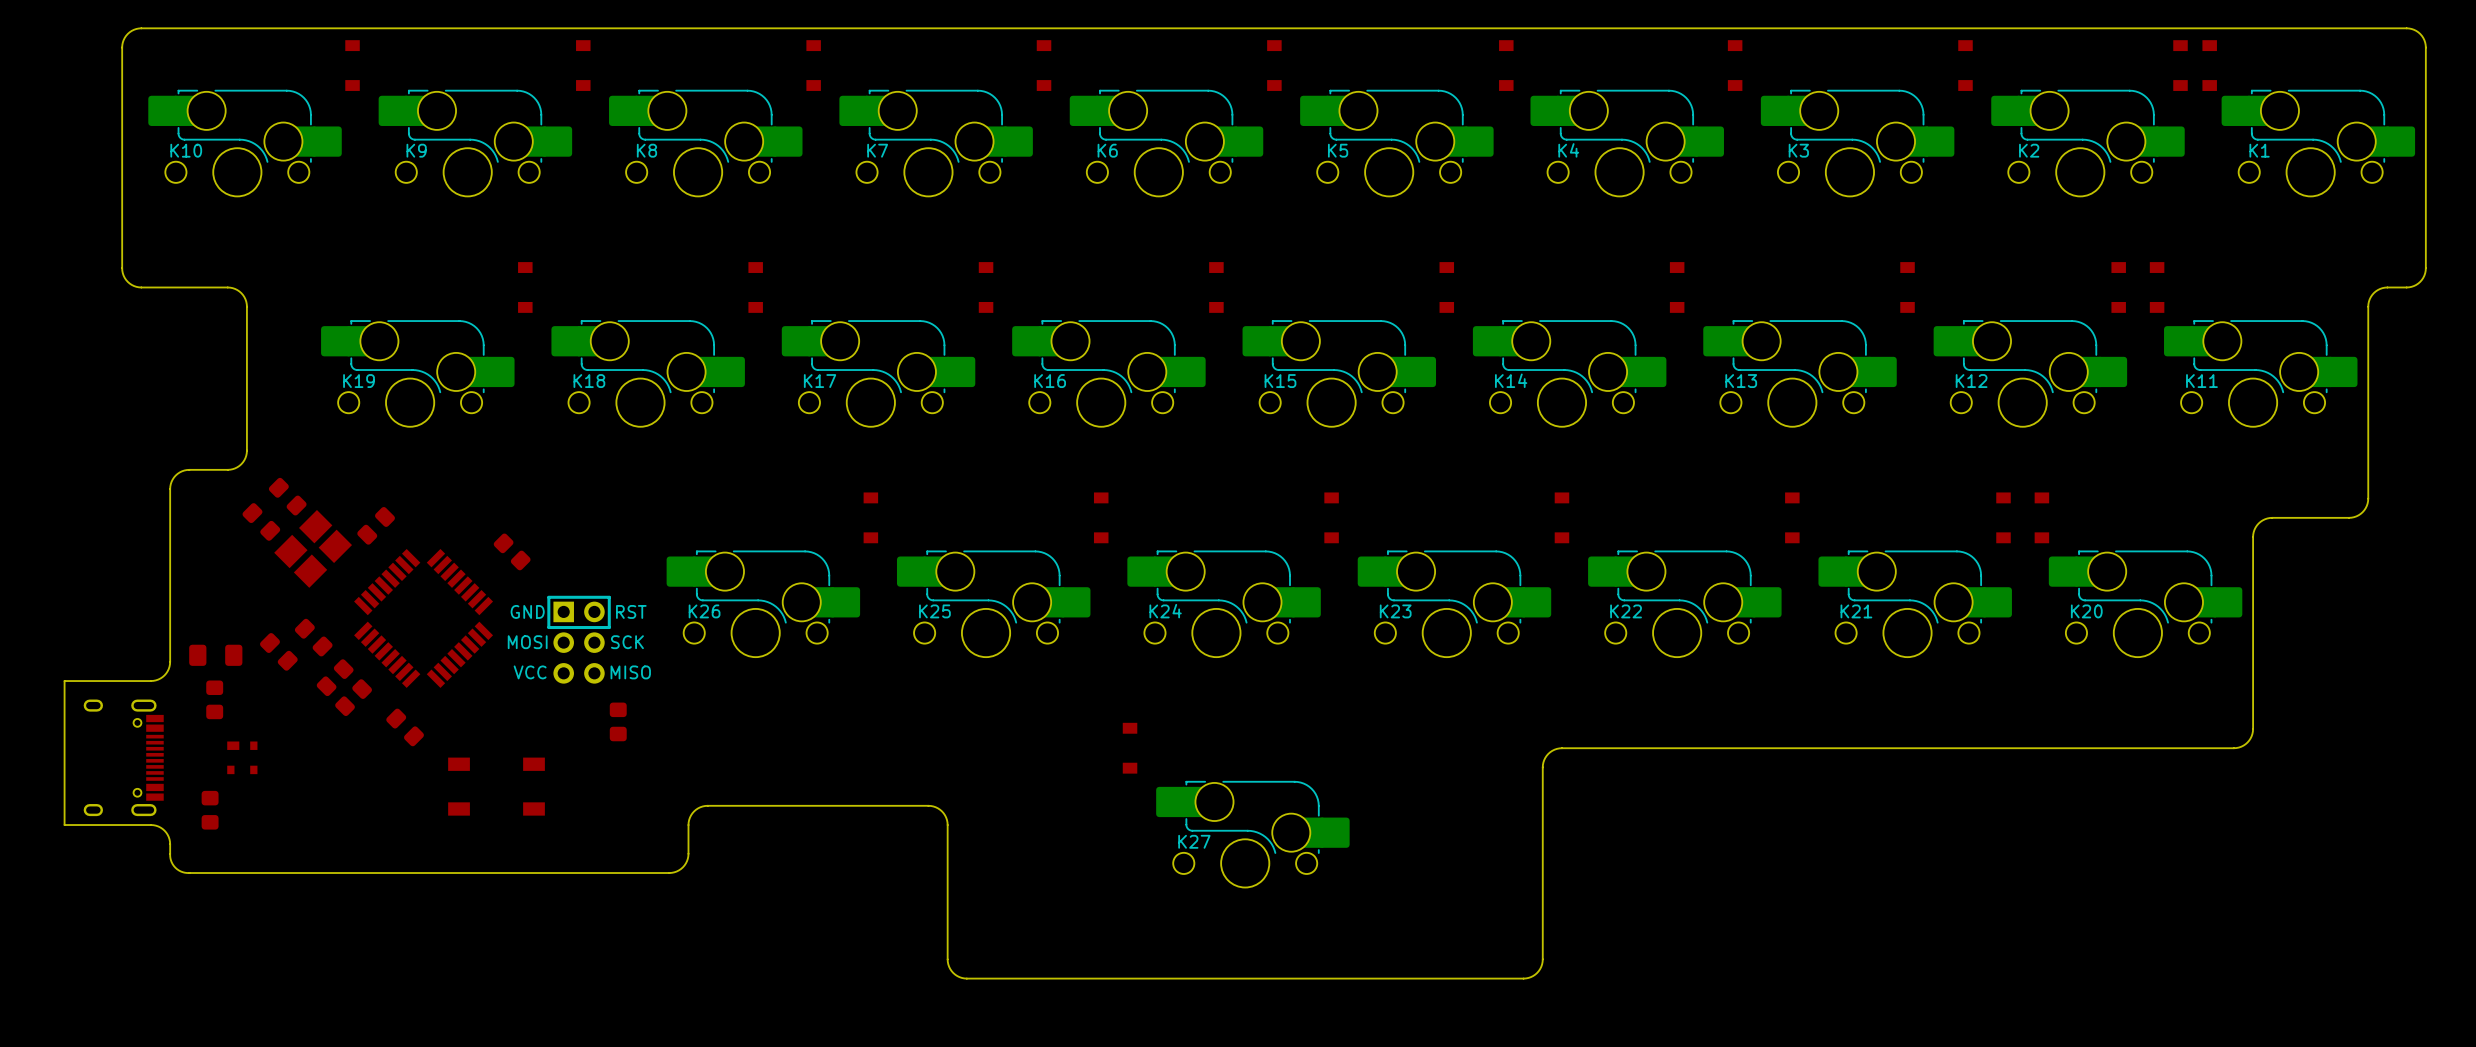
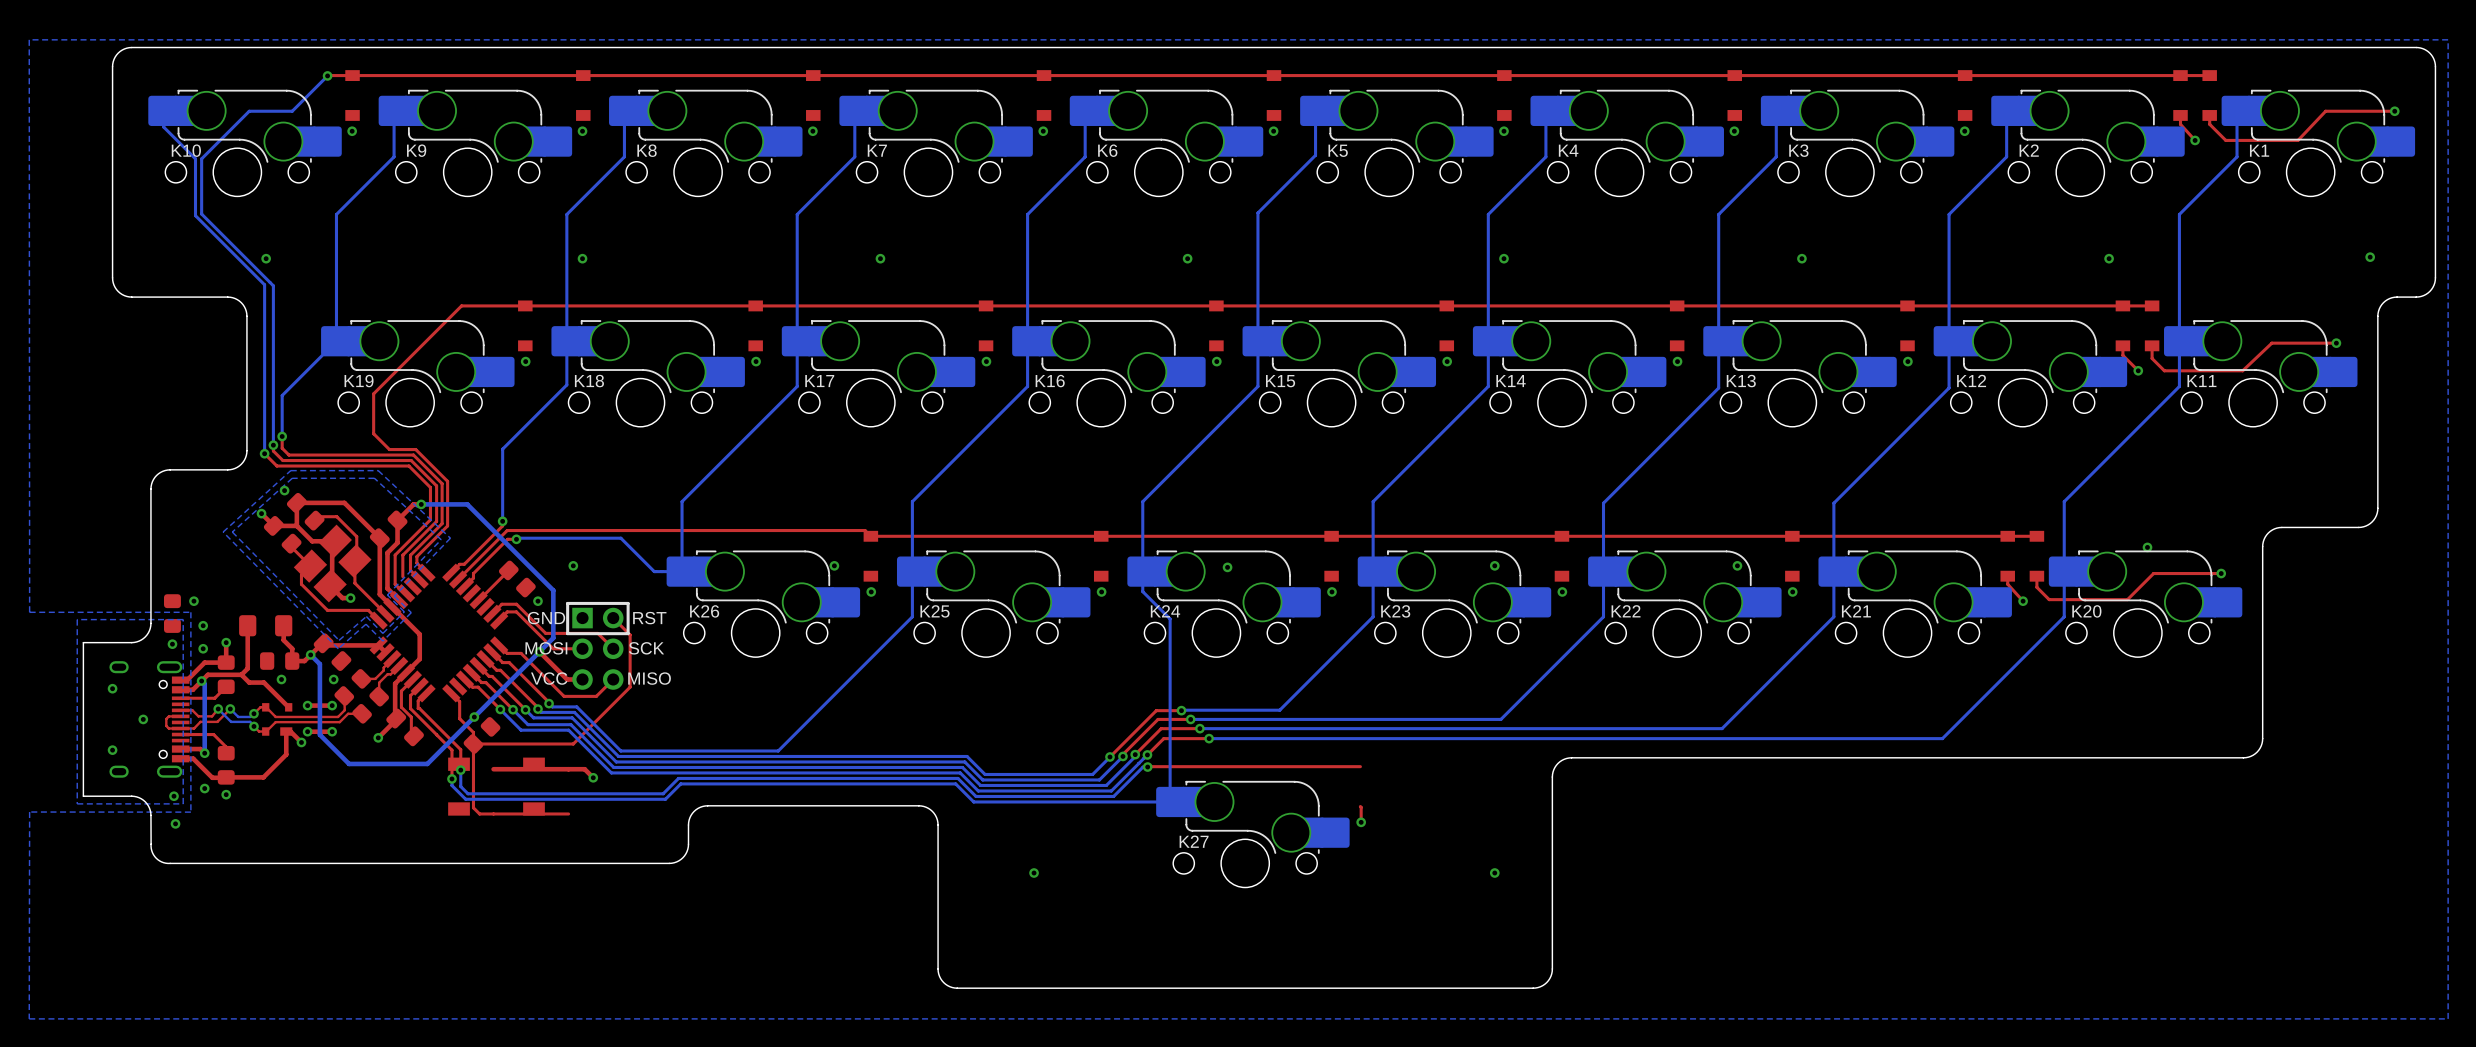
bottom zone outline: none -> (2448, 39) (2448, 1018) (29, 1018) (29, 812) (190, 812) (190, 612) (29, 612) (29, 39) (2448, 39)
part position: (352, 65) -> (352, 95)
part position: (583, 65) -> (583, 95)
part position: (813, 65) -> (813, 95)
part position: (1044, 65) -> (1044, 95)
part position: (1274, 65) -> (1274, 95)
part position: (1506, 65) -> (1504, 95)
part position: (1735, 65) -> (1734, 95)
part position: (1965, 65) -> (1965, 95)
part: (2180, 65) -> none
part: (2209, 65) -> none
bottom track: none -> (327, 75) (292, 111) (249, 111) (201, 158) (201, 214) (273, 285) (273, 445)
via: none -> (327, 75)
top track: none -> (2209, 75) (327, 75)
part: none -> (2180, 95)
part: none -> (2209, 95)
bottom track: none -> (163, 110) (163, 127) (195, 158) (195, 215) (264, 284) (264, 453)
bottom track: none -> (394, 110) (394, 156) (336, 214) (336, 341) (282, 395) (282, 436)
bottom track: none -> (624, 110) (624, 156) (566, 214) (566, 384) (502, 449) (502, 521)
bottom track: none -> (854, 110) (854, 156) (797, 214) (797, 386) (682, 501) (682, 571) (654, 571) (620, 538) (516, 539)
bottom track: none -> (1085, 110) (1085, 156) (1027, 214) (1027, 386) (912, 501) (912, 616) (778, 750) (620, 750) (576, 706) (552, 706) (549, 703)
bottom track: none -> (1315, 110) (1315, 155) (1257, 212) (1257, 386) (1142, 501) (1142, 591) (1170, 618) (1171, 801)
bottom track: none -> (1545, 110) (1545, 156) (1488, 214) (1488, 386) (1373, 501) (1373, 616) (1279, 710) (1181, 710)
bottom track: none -> (1776, 110) (1776, 156) (1718, 214) (1718, 388) (1603, 503) (1603, 616) (1500, 719) (1190, 719)
bottom track: none -> (2006, 110) (2006, 156) (1949, 214) (1949, 388) (1833, 503) (1833, 616) (1722, 728) (1199, 728)
bottom track: none -> (2237, 110) (2237, 156) (2179, 214) (2179, 386) (2064, 501) (2064, 616) (1942, 738) (1209, 738)
top track: none -> (2394, 111) (2325, 111) (2297, 140) (2225, 140) (2209, 124) (2209, 115)
via: none -> (2394, 111)
top track: none -> (2180, 115) (2180, 124) (2195, 140)
via: none -> (352, 131)
via: none -> (582, 131)
via: none -> (812, 131)
via: none -> (1043, 131)
via: none -> (1273, 131)
via: none -> (1503, 131)
via: none -> (1734, 131)
via: none -> (1964, 131)
via: none -> (2195, 140)
via: none -> (2370, 257)
via: none -> (266, 258)
via: none -> (582, 258)
via: none -> (880, 258)
via: none -> (1187, 258)
via: none -> (1503, 258)
via: none -> (1801, 258)
via: none -> (2109, 258)
part position: (525, 287) -> (525, 325)
part position: (755, 287) -> (755, 325)
part position: (986, 287) -> (986, 325)
part position: (1216, 287) -> (1216, 325)
part position: (1446, 287) -> (1446, 325)
part position: (1677, 287) -> (1677, 325)
part position: (1907, 287) -> (1907, 325)
part: (2118, 287) -> none
part: (2157, 287) -> none
top track: none -> (2152, 305) (461, 305) (373, 393) (373, 433) (389, 449) (415, 449) (447, 481) (447, 525) (416, 556) (416, 563) (426, 572)
board edge: (246, 316) (244, 297) (232, 288) (138, 287) (129, 283) (123, 275) (122, 47) (124, 37) (134, 29) (2406, 28) (2416, 30) (2423, 37) (2425, 47) (2425, 270) (2423, 277) (2416, 284) (2409, 287) (2380, 288) (2372, 294) (2368, 301) (2367, 503) (2362, 512) (2354, 517) (2269, 518) (2260, 521) (2255, 527) (2253, 537) (2253, 729) (2250, 738) (2243, 745) (2233, 748) (1557, 748) (1548, 753) (1542, 764) (1542, 961) (1535, 974) (1523, 978) (961, 977) (951, 971) (947, 961) (947, 820) (938, 808) (918, 805) -> (246, 316) (242, 304) (232, 297) (129, 296) (120, 293) (114, 285) (112, 66) (115, 57) (124, 48) (2416, 47) (2426, 50) (2433, 58) (2435, 66) (2435, 280) (2432, 287) (2425, 294) (2418, 296) (2389, 298) (2383, 302) (2378, 311) (2377, 513) (2372, 521) (2363, 526) (2279, 527) (2270, 531) (2265, 537) (2262, 546) (2262, 738) (2260, 748) (2253, 755) (2243, 757) (1566, 758) (1557, 763) (1552, 774) (1552, 971) (1546, 982) (1533, 988) (952, 987) (943, 982) (938, 971) (937, 822) (932, 811) (918, 805)
part: none -> (2122, 325)
part: none -> (2152, 325)
top track: none -> (2336, 343) (2271, 343) (2242, 370) (2164, 370) (2152, 358) (2152, 345)
via: none -> (2336, 343)
top track: none -> (2122, 345) (2122, 355) (2138, 370)
via: none -> (525, 361)
via: none -> (756, 361)
via: none -> (986, 361)
via: none -> (1216, 361)
via: none -> (1447, 361)
via: none -> (1677, 361)
via: none -> (1907, 361)
via: none -> (2138, 370)
top track: none -> (282, 436) (282, 448) (288, 455) (413, 455) (442, 483) (442, 523) (410, 555) (410, 570) (419, 579)
via: none -> (282, 436)
top track: none -> (273, 445) (273, 451) (282, 460) (411, 460) (436, 485) (436, 521) (402, 555) (402, 576)
via: none -> (273, 445)
top track: none -> (264, 453) (276, 466) (408, 466) (430, 487) (430, 519) (395, 555) (395, 584) (406, 593)
via: none -> (264, 453)
board edge: (189, 469) (177, 473) (170, 486) (170, 661) (167, 671) (162, 677) (153, 680) (64, 681) (64, 825) (158, 826) (168, 836) (172, 864) (178, 870) (187, 873) (669, 873) (678, 870) (685, 863) (688, 844) -> (189, 469) (162, 471) (156, 475) (151, 484) (150, 623) (148, 632) (141, 639) (134, 642) (83, 642) (83, 796) (131, 796) (143, 800) (150, 810) (151, 848) (157, 859) (167, 863) (669, 863) (682, 857) (688, 844)
bottom zone outline: none -> (378, 470) (450, 538) (394, 596) (411, 612) (382, 641) (365, 624) (338, 648) (223, 532) (290, 470) (378, 470)
bottom zone outline: none -> (374, 478) (441, 539) (387, 595) (404, 611) (382, 633) (366, 616) (339, 640) (232, 532) (292, 478) (374, 478)
via: none -> (284, 490)
part: (287, 496) -> none
top track: none -> (421, 504) (413, 504) (397, 520) (397, 542) (387, 552) (387, 588) (399, 600)
bottom track: none -> (421, 504) (467, 504) (553, 590) (553, 638) (427, 763) (349, 763) (319, 734) (319, 664) (310, 654)
via: none -> (421, 504)
part: none -> (305, 511)
top track: none -> (261, 513) (273, 525) (296, 525)
via: none -> (261, 513)
part position: (870, 517) -> (870, 556)
part position: (1101, 517) -> (1101, 556)
part position: (1331, 517) -> (1331, 556)
part position: (1561, 517) -> (1561, 556)
part position: (1792, 517) -> (1792, 556)
part: (2003, 517) -> none
part: (2041, 517) -> none
top track: none -> (314, 520) (318, 516) (336, 516) (356, 536) (354, 583) (385, 613)
part: (261, 521) -> none
top track: none -> (502, 521) (502, 525) (464, 564) (459, 564) (451, 572)
via: none -> (502, 521)
top track: none -> (296, 525) (312, 541) (335, 541) (332, 544) (332, 583) (330, 585) (342, 598) (350, 598)
top track: none -> (296, 525) (296, 502) (344, 502) (379, 538) (379, 594) (419, 634) (419, 659) (395, 683) (395, 720) (378, 737)
part position: (376, 525) -> (388, 529)
part: none -> (282, 534)
top track: none -> (2036, 536) (870, 536) (865, 530) (507, 530) (458, 579)
top track: none -> (516, 539) (507, 539) (473, 573) (473, 578) (465, 586)
via: none -> (516, 539)
top track: none -> (291, 543) (291, 547) (310, 566) (301, 575) (301, 584) (327, 610) (368, 610) (378, 620)
via: none -> (2147, 547)
part position: (313, 548) -> (332, 563)
part position: (512, 551) -> (517, 579)
part: none -> (2007, 556)
part: none -> (2036, 556)
via: none -> (573, 565)
via: none -> (834, 565)
via: none -> (1494, 565)
via: none -> (1737, 565)
via: none -> (1227, 567)
top track: none -> (508, 570) (478, 600)
top track: none -> (2221, 573) (2153, 573) (2127, 599) (2049, 599) (2036, 587) (2036, 576)
via: none -> (2221, 573)
top track: none -> (2007, 576) (2007, 584) (2023, 601)
via: none -> (871, 591)
via: none -> (1101, 591)
via: none -> (1331, 591)
via: none -> (1562, 591)
via: none -> (1792, 591)
via: none -> (350, 598)
via: none -> (193, 601)
via: none -> (537, 601)
via: none -> (2023, 601)
part: none -> (172, 613)
top track: none -> (492, 613) (501, 604) (516, 604) (545, 633) (597, 633) (613, 648)
part position: (423, 618) -> (438, 633)
top track: none -> (613, 618) (630, 634) (630, 687) (573, 744) (473, 744)
bottom zone outline: none -> (183, 619) (183, 803) (77, 803) (77, 619) (183, 619)
top track: none -> (499, 620) (507, 611) (516, 611) (553, 648) (582, 648)
via: none -> (203, 625)
top track: none -> (247, 625) (247, 668) (241, 674)
top track: none -> (283, 625) (283, 640) (292, 648) (292, 661) (304, 661) (322, 643) (325, 645) (378, 645) (385, 652)
part position: (313, 637) -> (332, 652)
part position: (579, 639) -> (597, 645)
top track: none -> (226, 642) (226, 662) (204, 662) (187, 680) (180, 680)
via: none -> (226, 642)
via: none -> (172, 644)
top track: none -> (499, 645) (507, 653) (521, 653) (564, 696) (596, 696) (613, 679)
via: none -> (203, 648)
part rotation: 0° (278, 651) -> 45° counterclockwise (279, 661)
top track: none -> (539, 651) (567, 679) (582, 679)
via: none -> (539, 651)
top track: none -> (492, 652) (502, 662) (509, 662) (549, 703)
via: none -> (310, 654)
part position: (215, 655) -> (265, 625)
top track: none -> (392, 659) (375, 678) (361, 678)
top track: none -> (485, 659) (496, 670) (500, 670) (537, 709)
top track: none -> (399, 665) (379, 682) (379, 696)
top track: none -> (478, 665) (489, 676) (492, 676) (525, 709)
top track: none -> (471, 672) (481, 682) (485, 682) (513, 709)
top track: none -> (241, 674) (249, 682) (263, 682) (288, 707)
top track: none -> (241, 674) (207, 674) (192, 689) (180, 689)
part: (335, 677) -> none
via: none -> (281, 679)
via: none -> (333, 679)
top track: none -> (412, 679) (401, 691) (401, 707) (411, 717) (411, 740)
top track: none -> (465, 679) (472, 687) (478, 687) (500, 709)
bottom track: none -> (201, 681) (204, 684) (204, 753)
via: none -> (201, 681)
top track: none -> (226, 686) (214, 698) (180, 698)
top track: none -> (419, 686) (410, 695) (410, 708) (436, 734)
part: none -> (352, 687)
via: none -> (112, 688)
top track: none -> (426, 693) (418, 700) (418, 708) (460, 749) (460, 770)
top track: none -> (451, 693) (459, 701) (459, 718) (473, 732) (473, 807) (479, 813) (568, 813)
top track: none -> (344, 695) (344, 710) (338, 716) (275, 716) (266, 707) (260, 707) (253, 713)
part: (353, 697) -> none
part position: (214, 699) -> (226, 674)
via: none -> (549, 703)
via: none -> (307, 705)
top track: none -> (332, 705) (307, 705)
via: none -> (332, 705)
part: none -> (370, 705)
top track: none -> (218, 708) (212, 716) (198, 716) (192, 710) (180, 710)
bottom track: none -> (218, 708) (231, 721) (250, 721) (253, 726)
via: none -> (218, 708)
top track: none -> (230, 708) (217, 721) (200, 721) (194, 728) (168, 728) (166, 725) (166, 718) (168, 716) (180, 716)
bottom track: none -> (230, 708) (238, 716) (250, 716) (253, 713)
via: none -> (230, 708)
bottom track: none -> (500, 709) (521, 730) (568, 730) (611, 772) (960, 772) (978, 790) (1111, 790) (1147, 754)
via: none -> (500, 709)
bottom track: none -> (513, 709) (528, 724) (570, 724) (613, 767) (962, 767) (980, 785) (1106, 785) (1135, 754)
via: none -> (513, 709)
bottom track: none -> (525, 709) (533, 717) (572, 717) (616, 761) (964, 761) (982, 779) (1099, 779) (1122, 756)
via: none -> (525, 709)
bottom track: none -> (537, 709) (541, 712) (574, 712) (618, 756) (967, 756) (985, 774) (1092, 774) (1110, 757)
via: none -> (537, 709)
top track: none -> (1181, 710) (1156, 710) (1110, 756)
via: none -> (1181, 710)
via: none -> (253, 713)
top track: none -> (362, 713) (348, 713) (339, 722) (275, 722) (266, 731) (259, 731) (253, 726)
via: none -> (474, 717)
via: none -> (143, 719)
top track: none -> (1190, 719) (1158, 719) (1122, 756)
via: none -> (1190, 719)
part: (618, 721) -> none
via: none -> (253, 726)
top track: none -> (1199, 728) (1161, 728) (1135, 754)
via: none -> (1199, 728)
via: none -> (307, 731)
top track: none -> (332, 731) (307, 731)
via: none -> (332, 731)
top track: none -> (180, 734) (213, 734) (226, 747) (226, 753)
top track: none -> (436, 734) (451, 750) (451, 778)
part: none -> (482, 735)
via: none -> (378, 737)
top track: none -> (1209, 738) (1163, 738) (1147, 754)
via: none -> (1209, 738)
top track: none -> (301, 742) (290, 731) (286, 731) (286, 754) (263, 777) (212, 777) (193, 758) (180, 758)
via: none -> (301, 742)
part: (1130, 748) -> none
top track: none -> (180, 749) (200, 749) (204, 753)
via: none -> (112, 750)
via: none -> (204, 753)
via: none -> (1135, 754)
via: none -> (1147, 754)
via: none -> (1110, 756)
via: none -> (1122, 756)
part position: (123, 757) -> (149, 719)
part rotation: 0° (242, 757) -> 180° (277, 719)
part position: (242, 757) -> (277, 719)
part: none -> (226, 765)
top track: none -> (1360, 766) (1147, 767)
bottom track: none -> (1147, 767) (1143, 767) (1113, 796) (976, 796) (957, 778) (678, 778) (663, 793) (467, 793) (460, 786) (460, 770)
via: none -> (1147, 767)
top track: none -> (493, 769) (584, 769) (593, 777)
via: none -> (460, 770)
via: none -> (593, 777)
bottom track: none -> (451, 778) (451, 785) (465, 799) (665, 799) (680, 783) (955, 783) (973, 801) (1171, 801)
via: none -> (451, 778)
via: none -> (204, 788)
via: none -> (226, 794)
via: none -> (174, 796)
top track: none -> (1360, 806) (1361, 822)
part: (210, 810) -> none
via: none -> (1361, 822)
via: none -> (175, 823)
via: none -> (1034, 873)
via: none -> (1494, 873)

